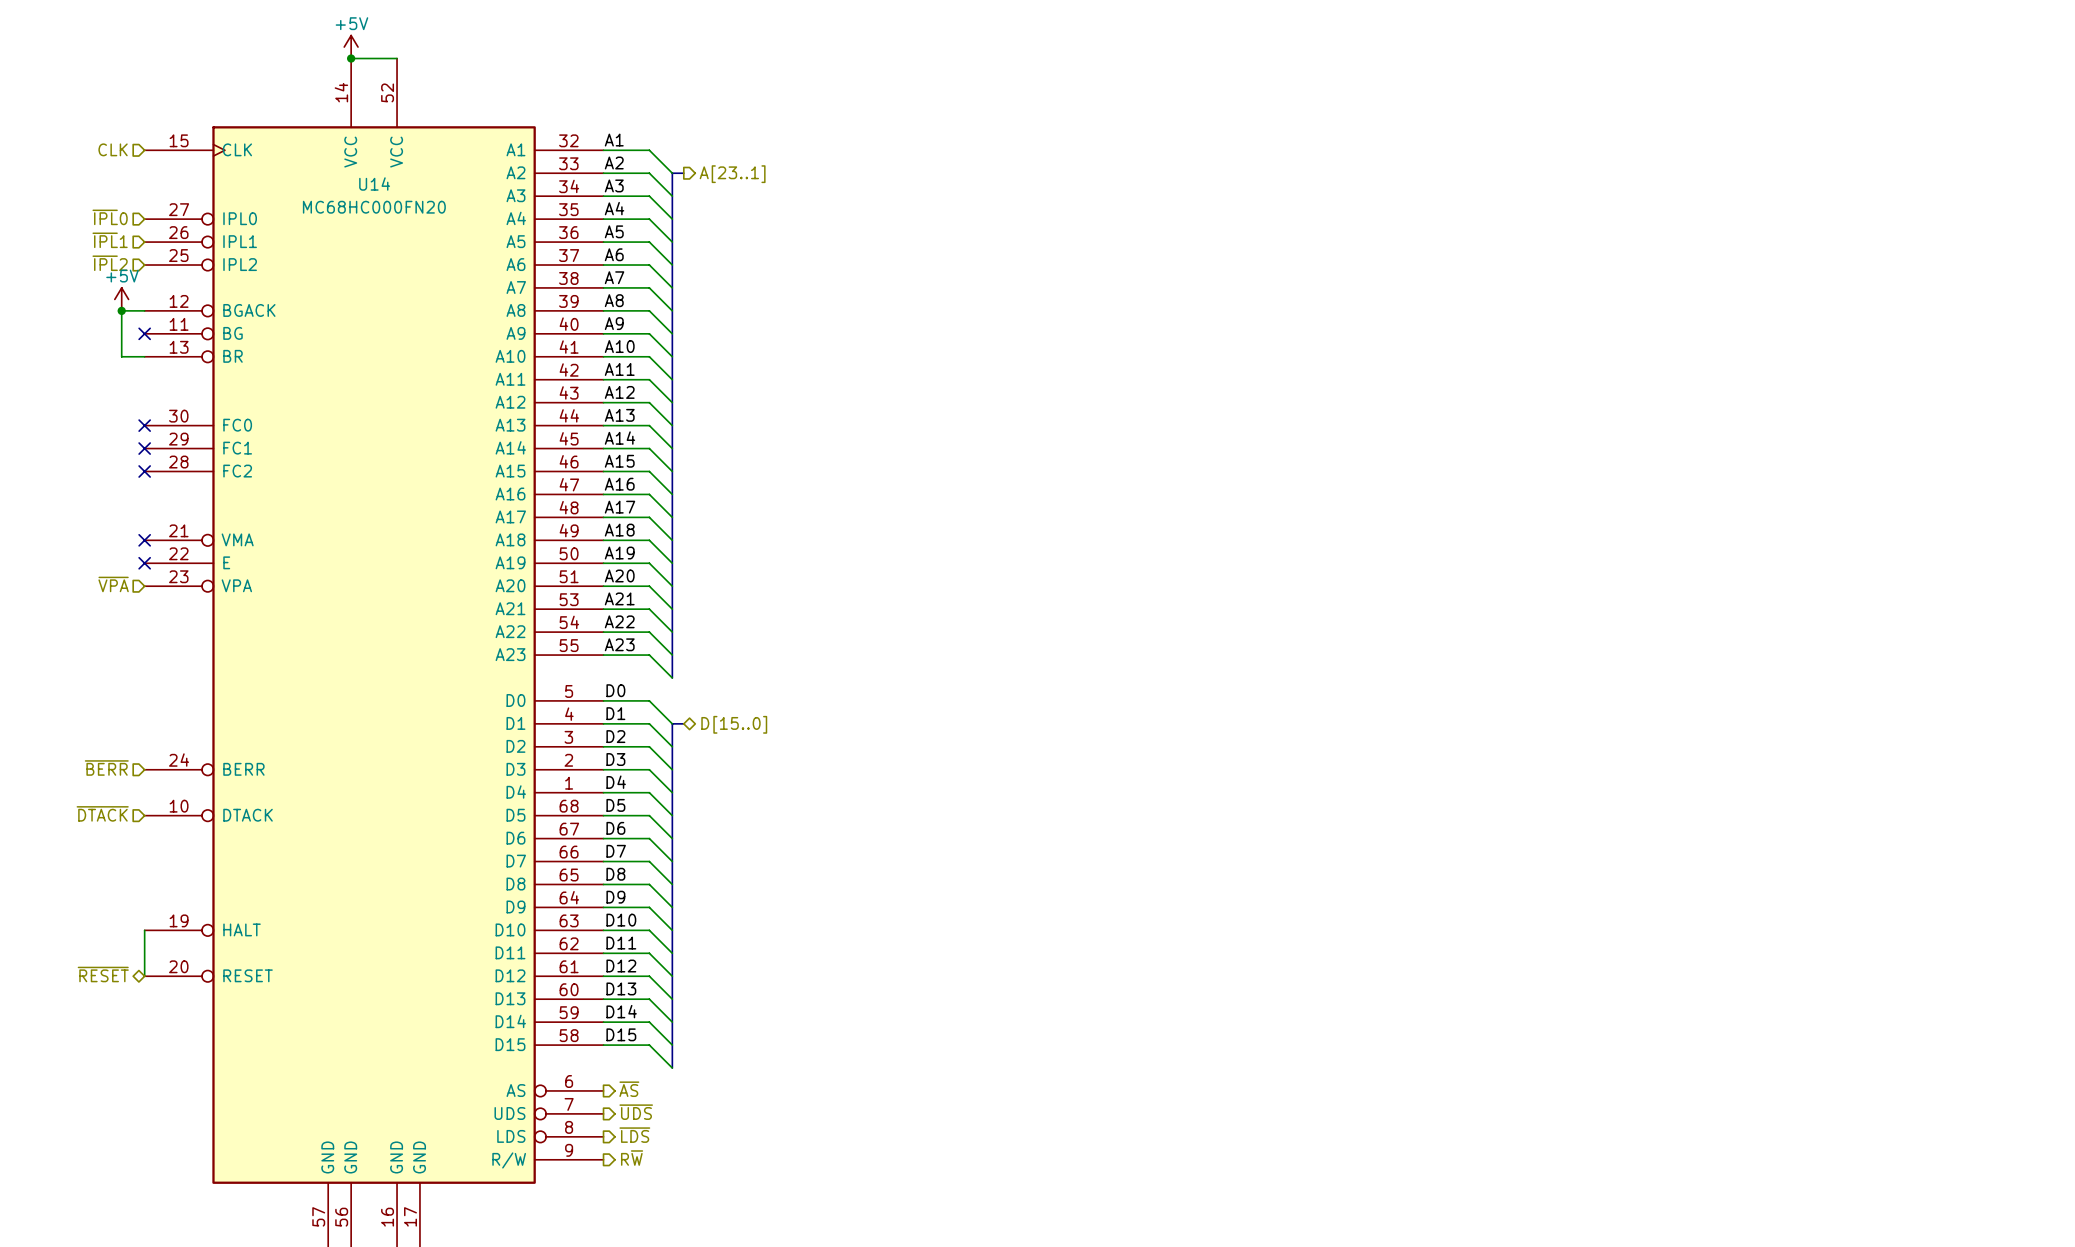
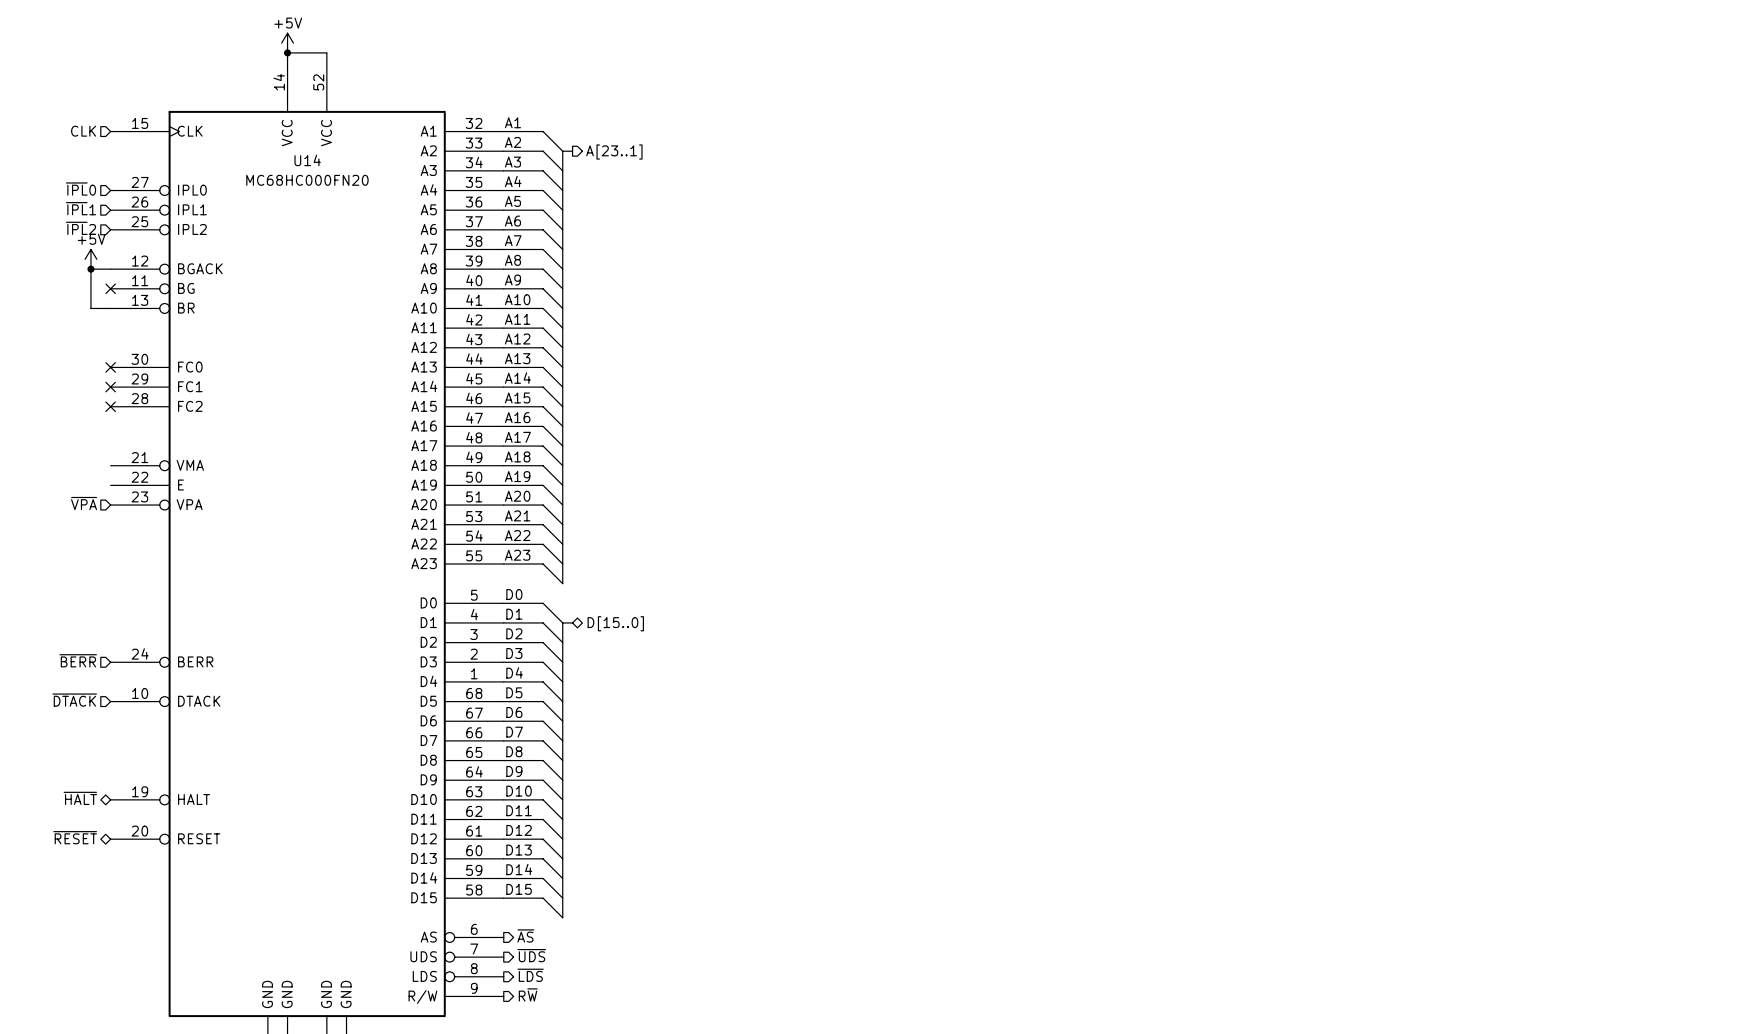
no-connect mark: (144, 540) -> none
no-connect mark: (144, 563) -> none
hierarchical label: none -> ~{HALT} (80, 798)
wire: (144, 930) (144, 976) -> none

